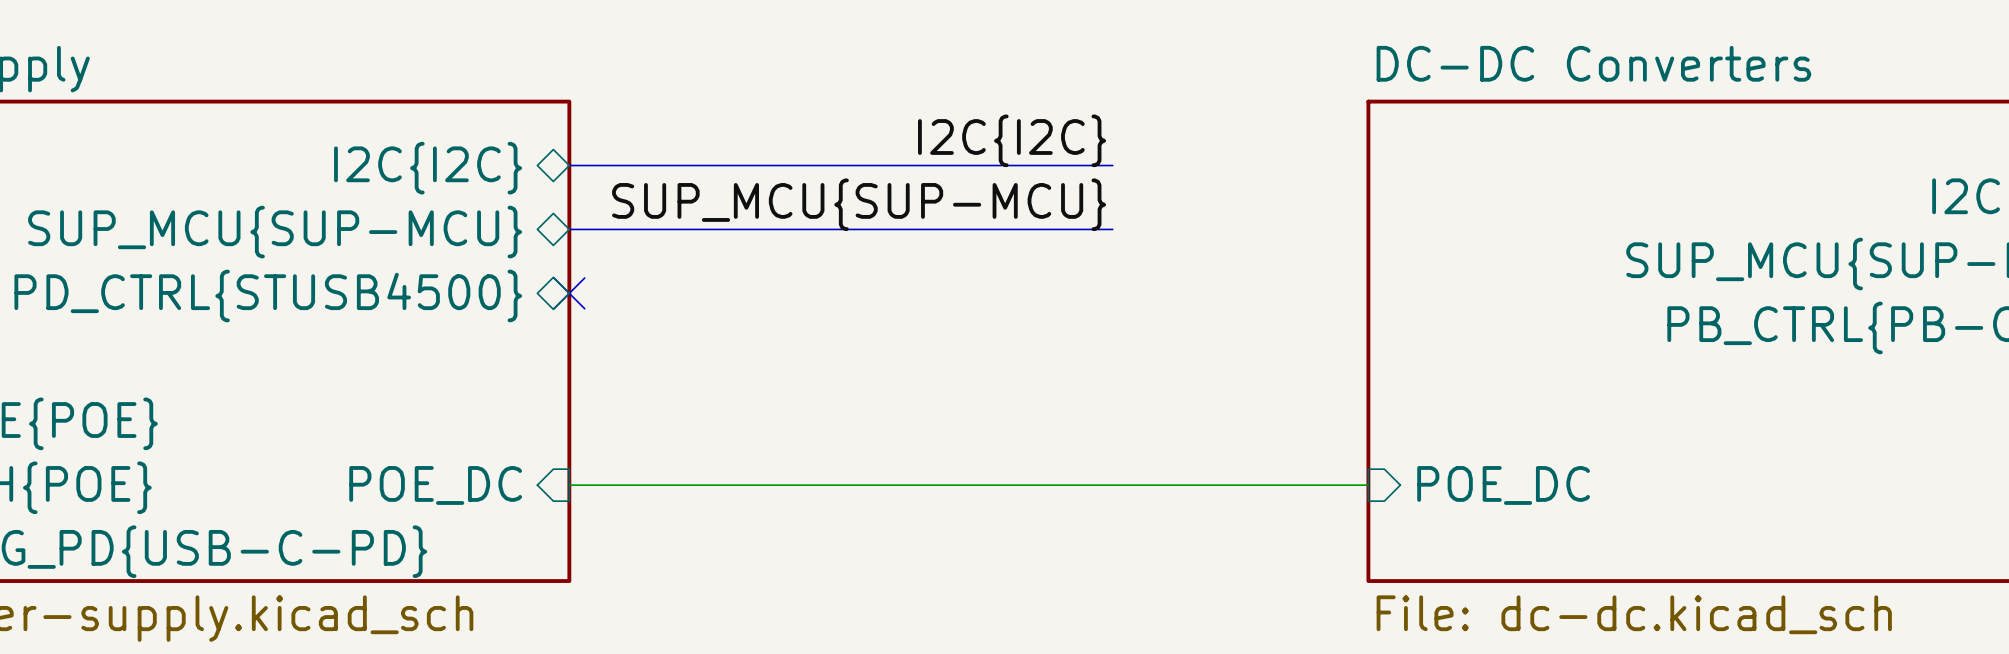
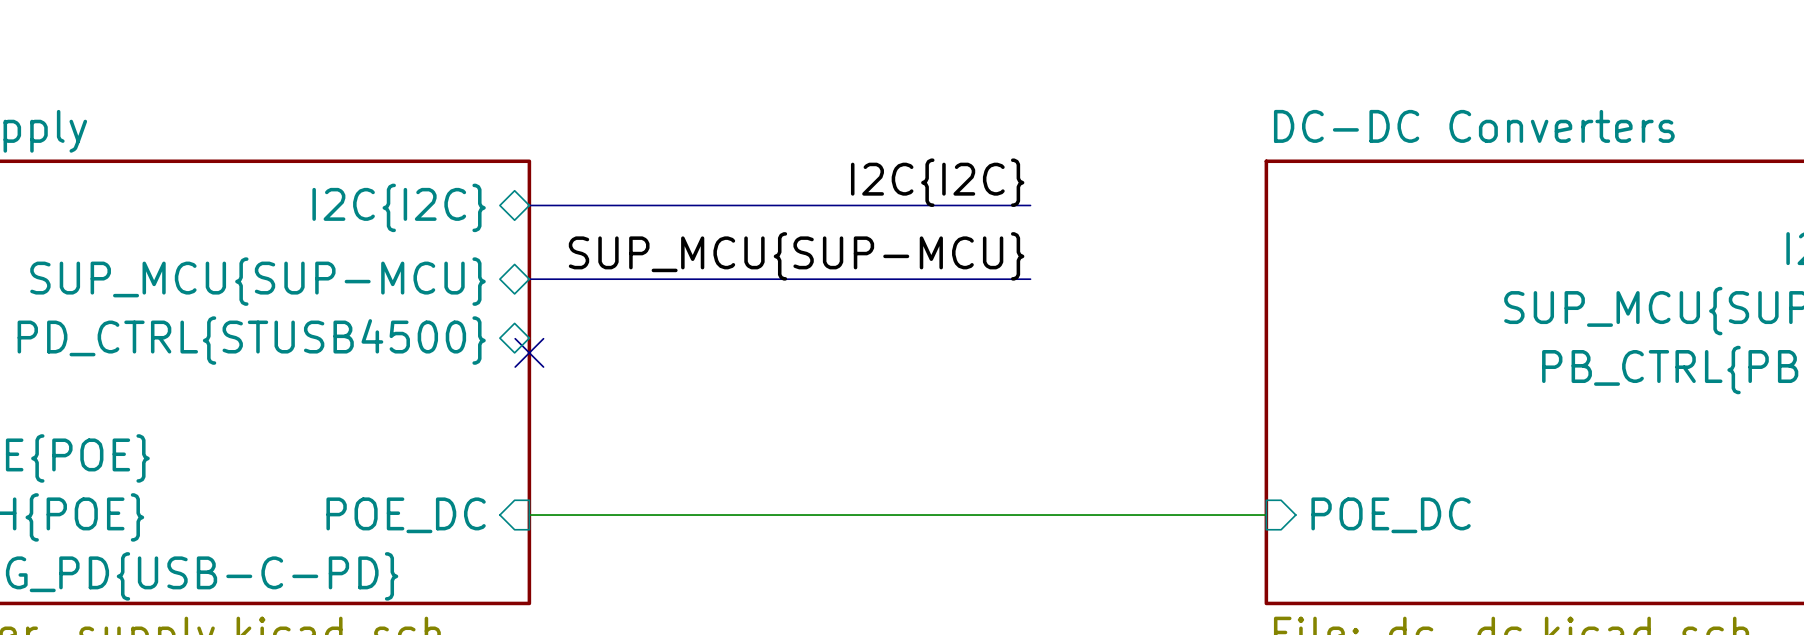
label position: I2C{I2C} (1012, 140) -> I2C{I2C} (937, 182)
bus: (569, 165) (1112, 165) -> (529, 205) (1030, 205)
sheet pin position: I2C{I2C} (428, 168) -> I2C{I2C} (399, 207)
no-connect mark position: (569, 293) -> (529, 352)

